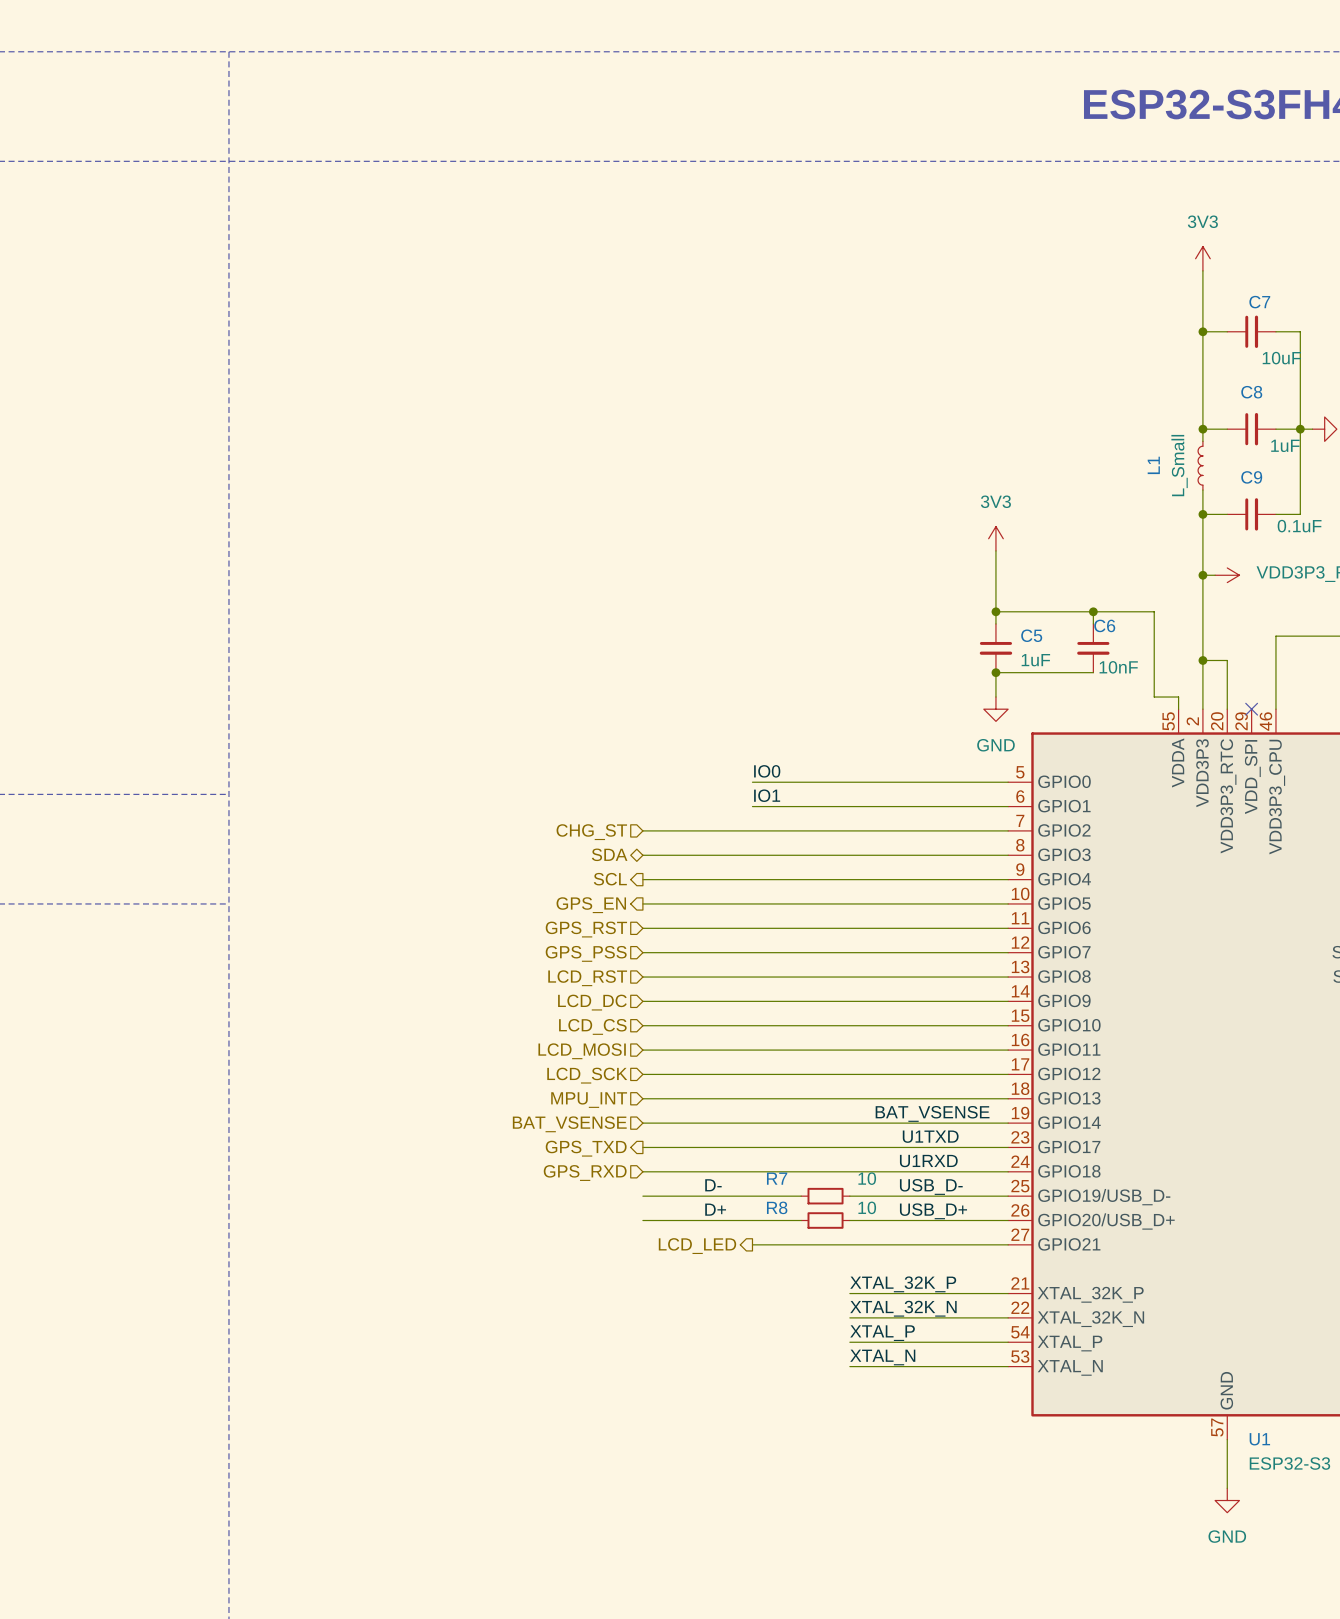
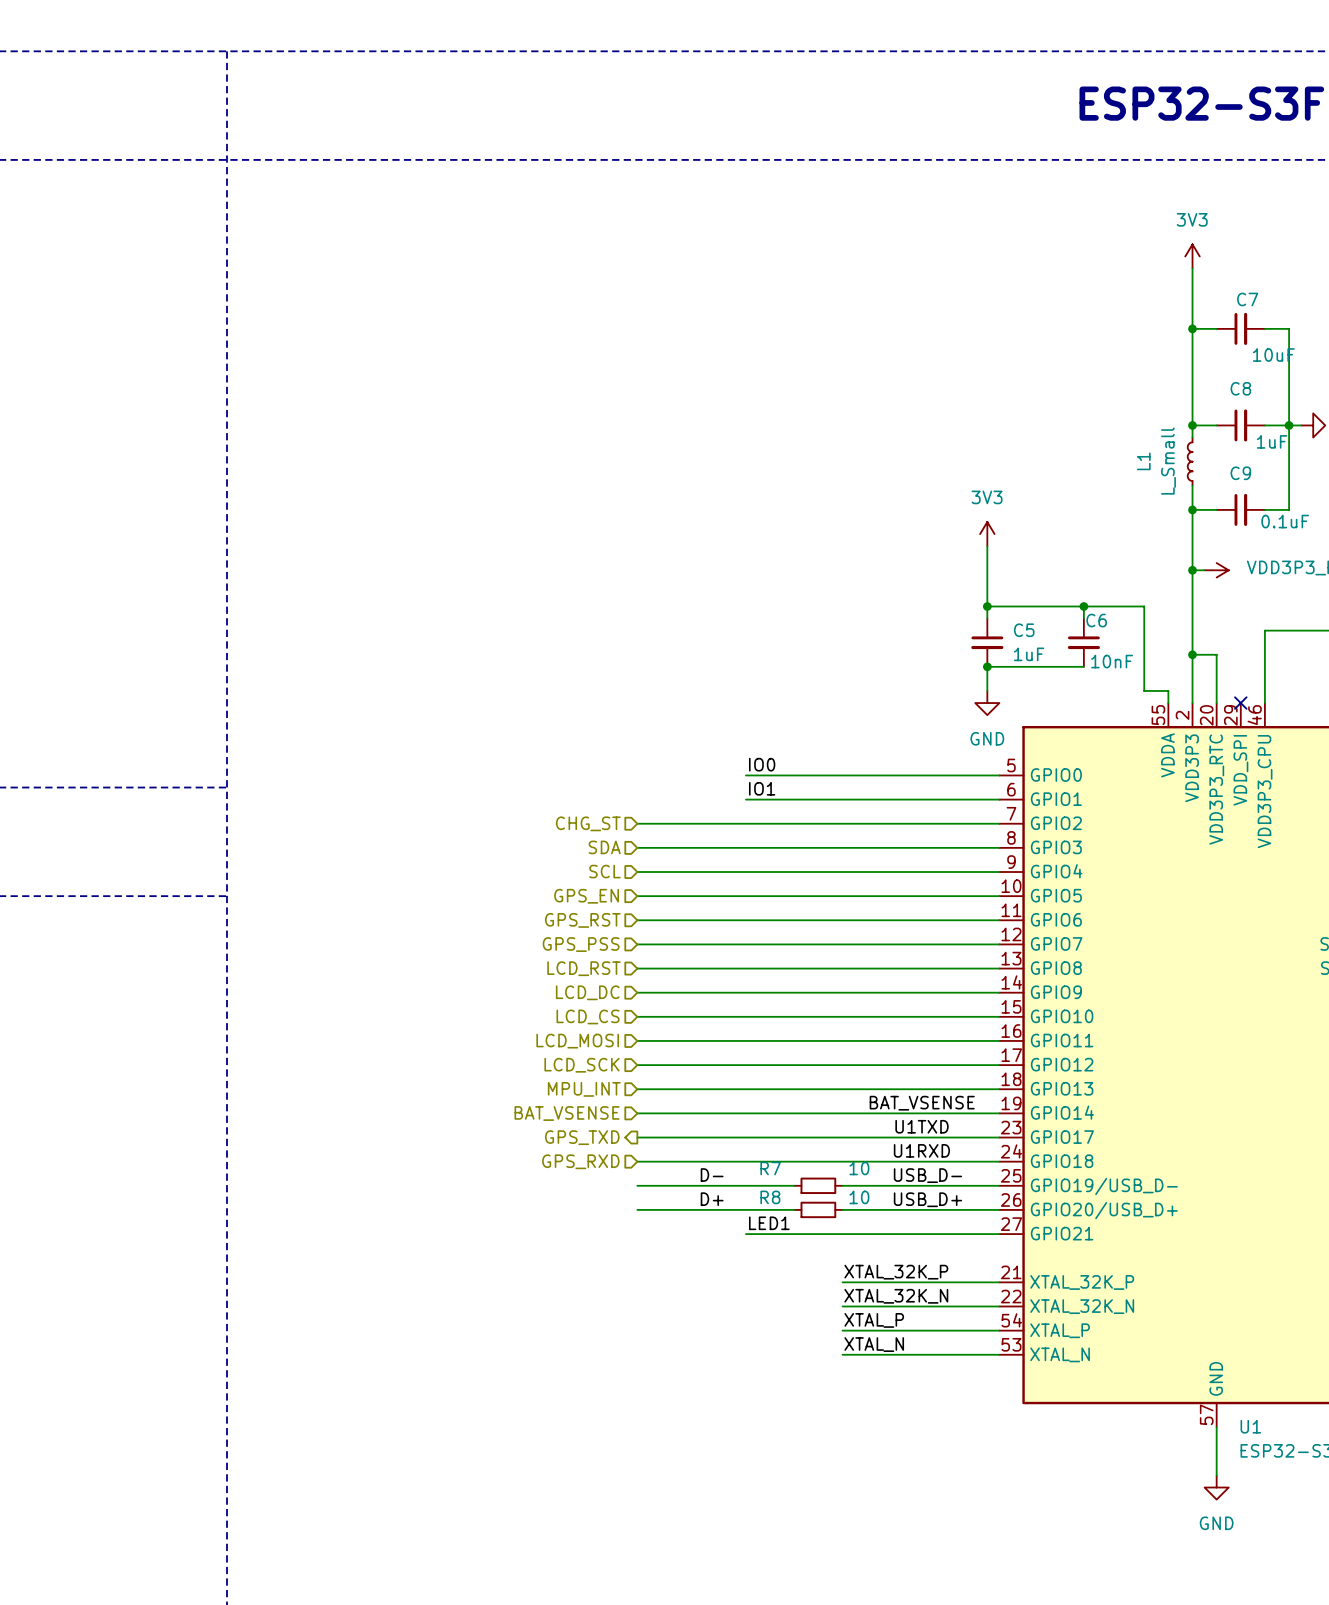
hierarchical label shape: bidirectional (609, 854) -> input (604, 847)
hierarchical label shape: output (610, 879) -> input (604, 871)
hierarchical label shape: output (591, 905) -> input (586, 896)
label: none -> LED1 (769, 1223)
hierarchical label: LCD_LED (697, 1246) -> none

